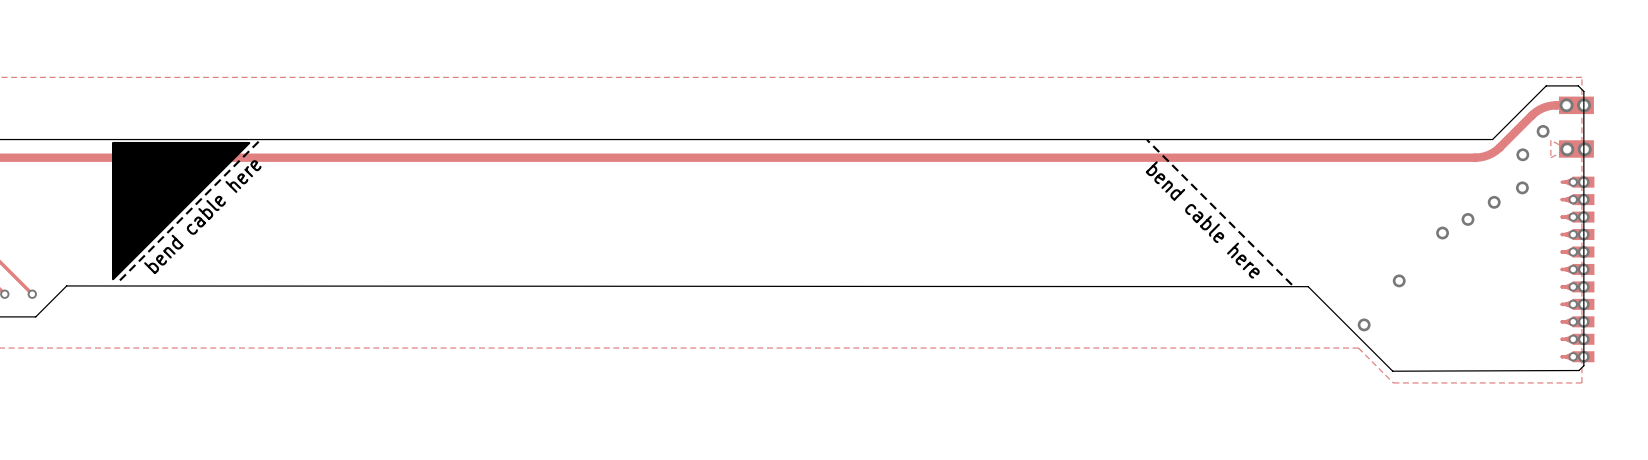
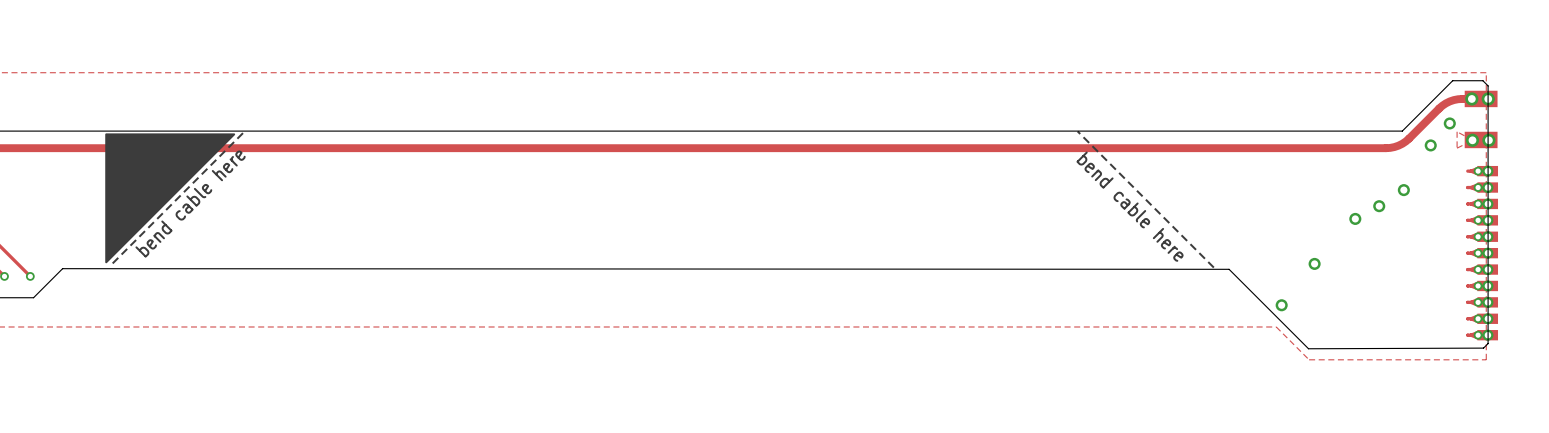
via: (1522, 187) -> none

